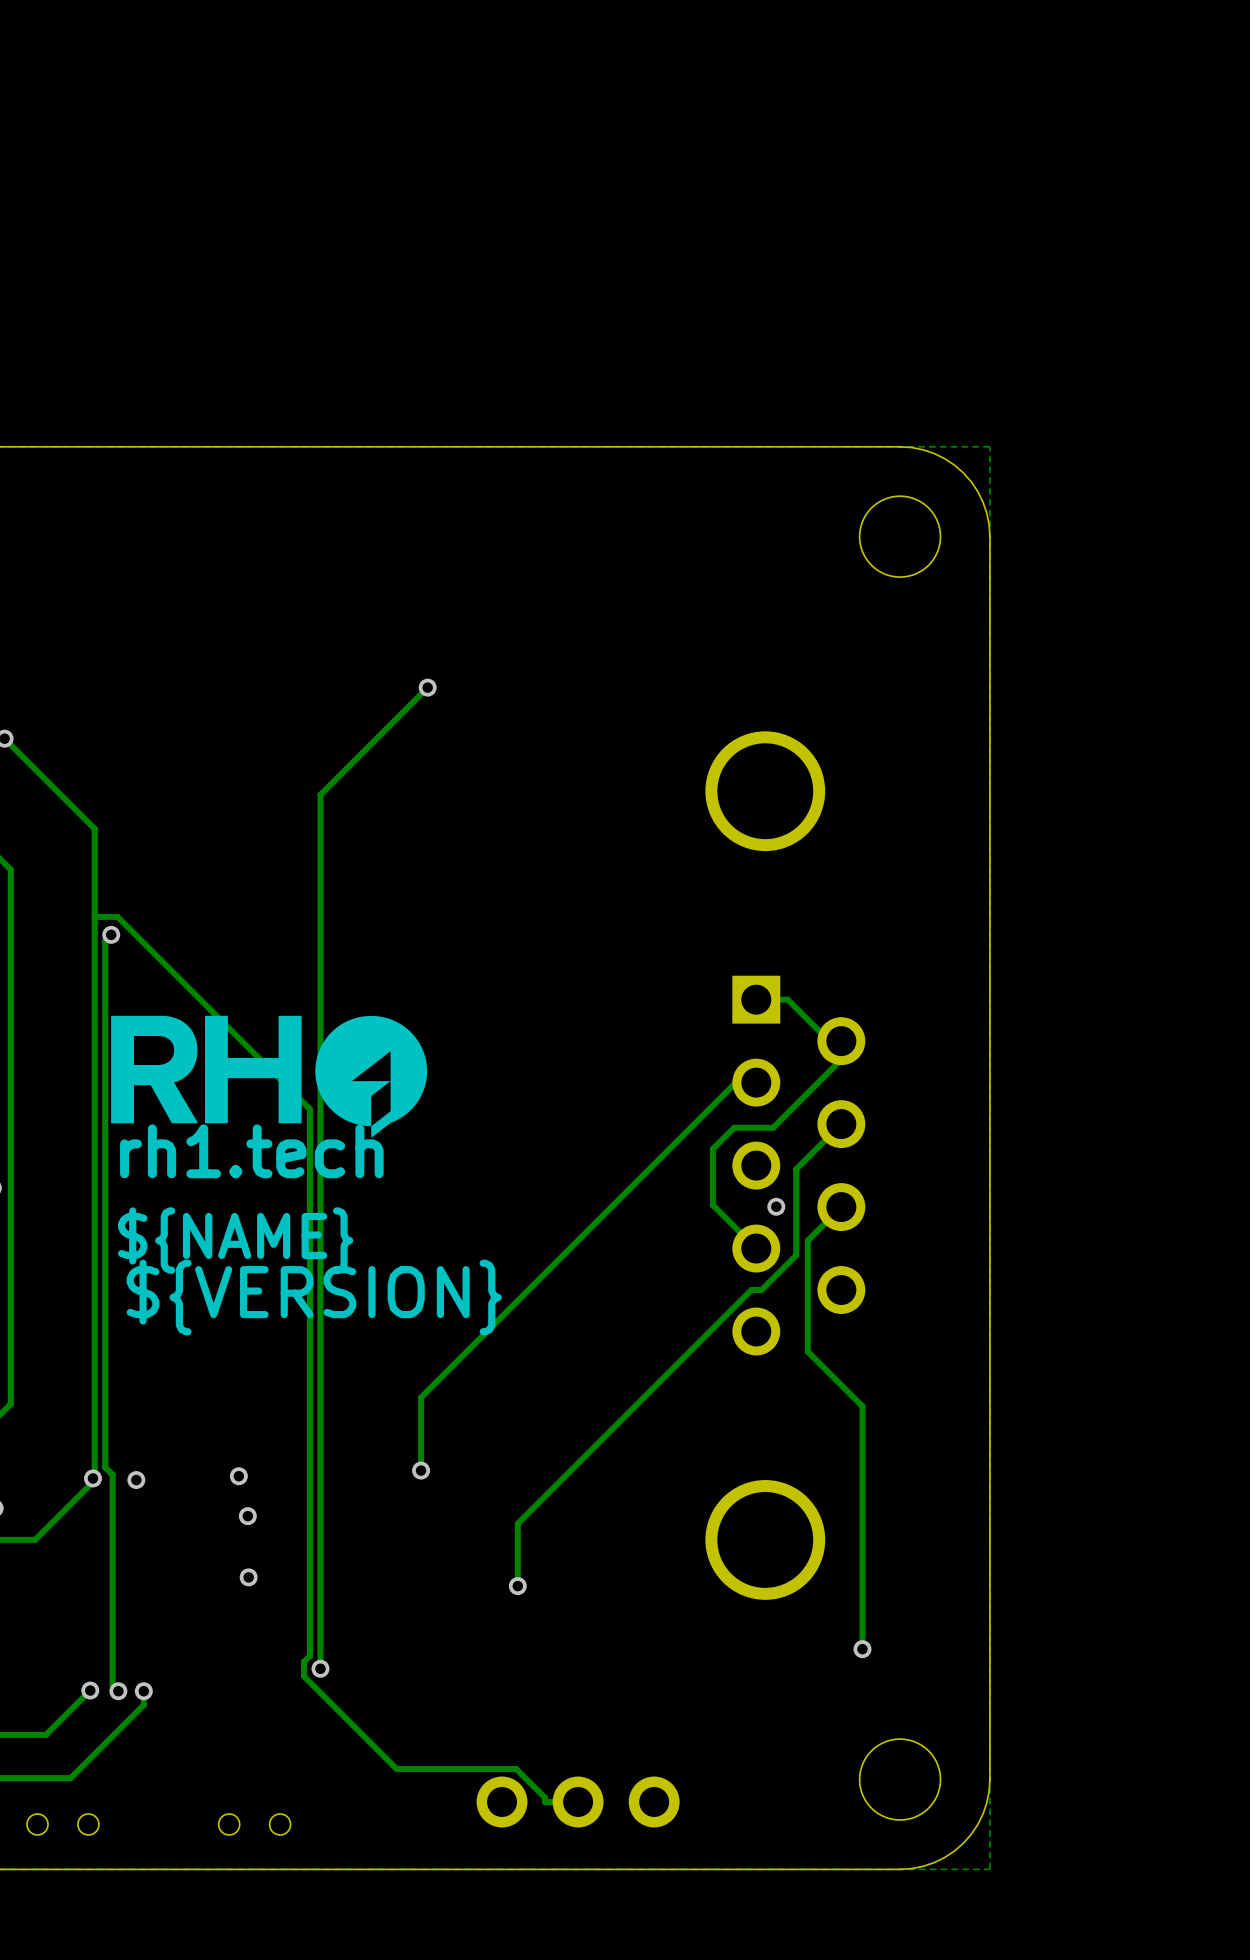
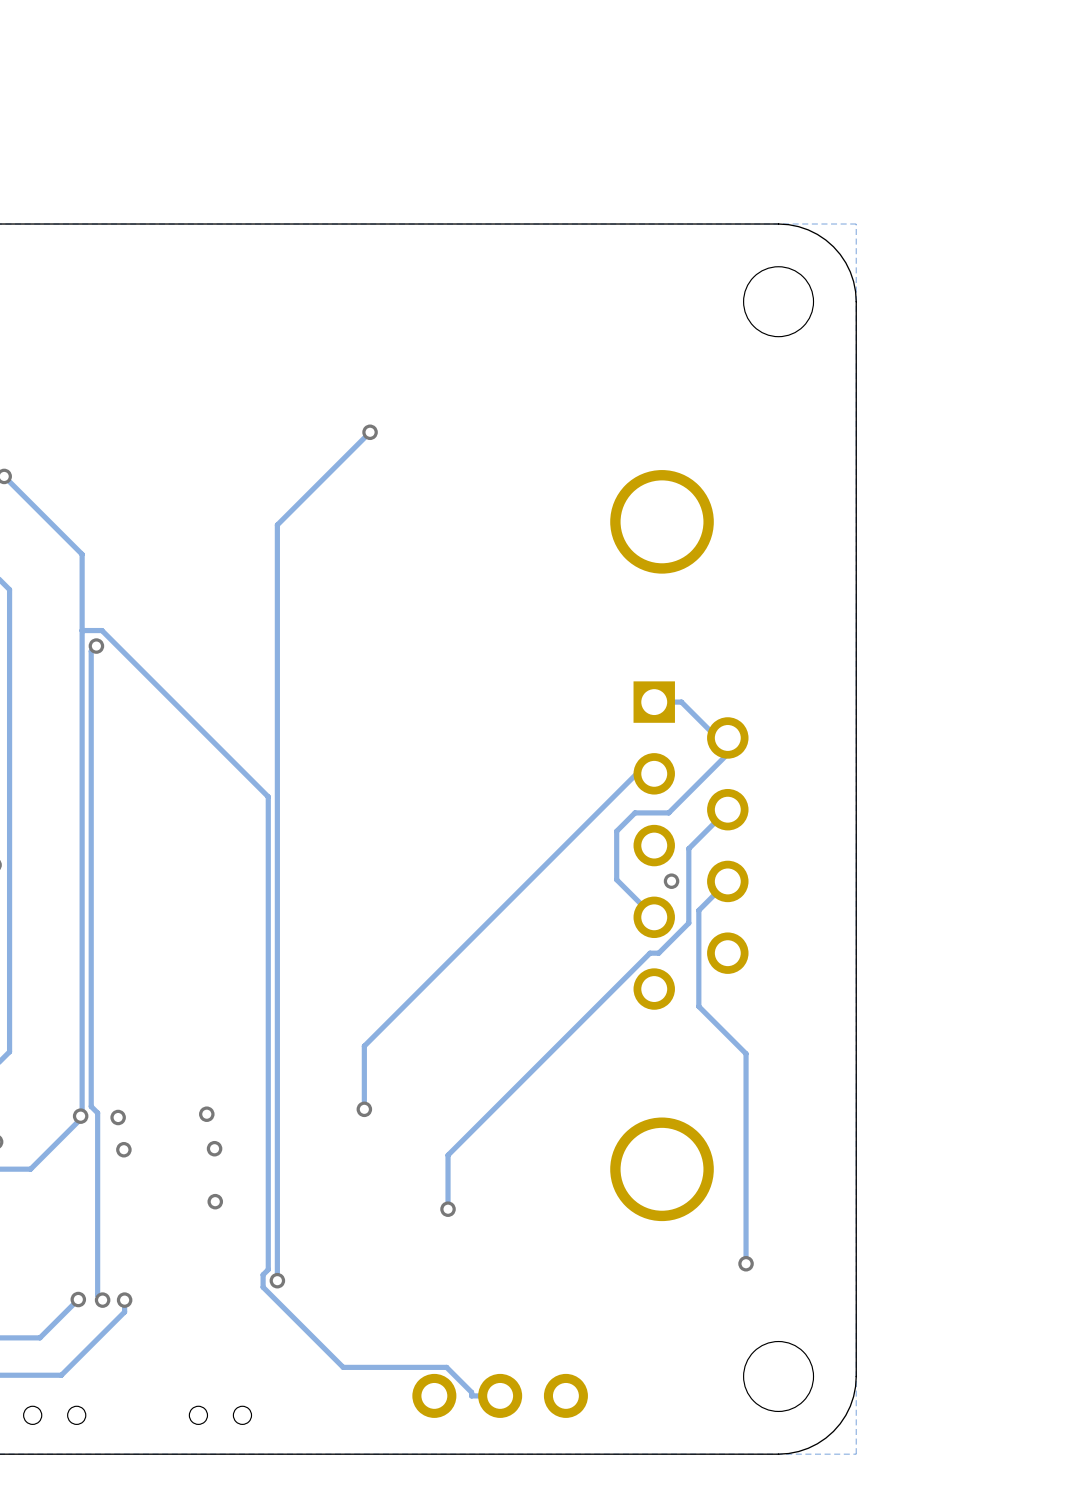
drawing: [111, 1015, 428, 1138] -> none
text: rh1.tech (251, 1151) -> none
text: ${NAME} (235, 1240) -> none
text: ${VERSION} (314, 1297) -> none
via: none -> (123, 1149)

